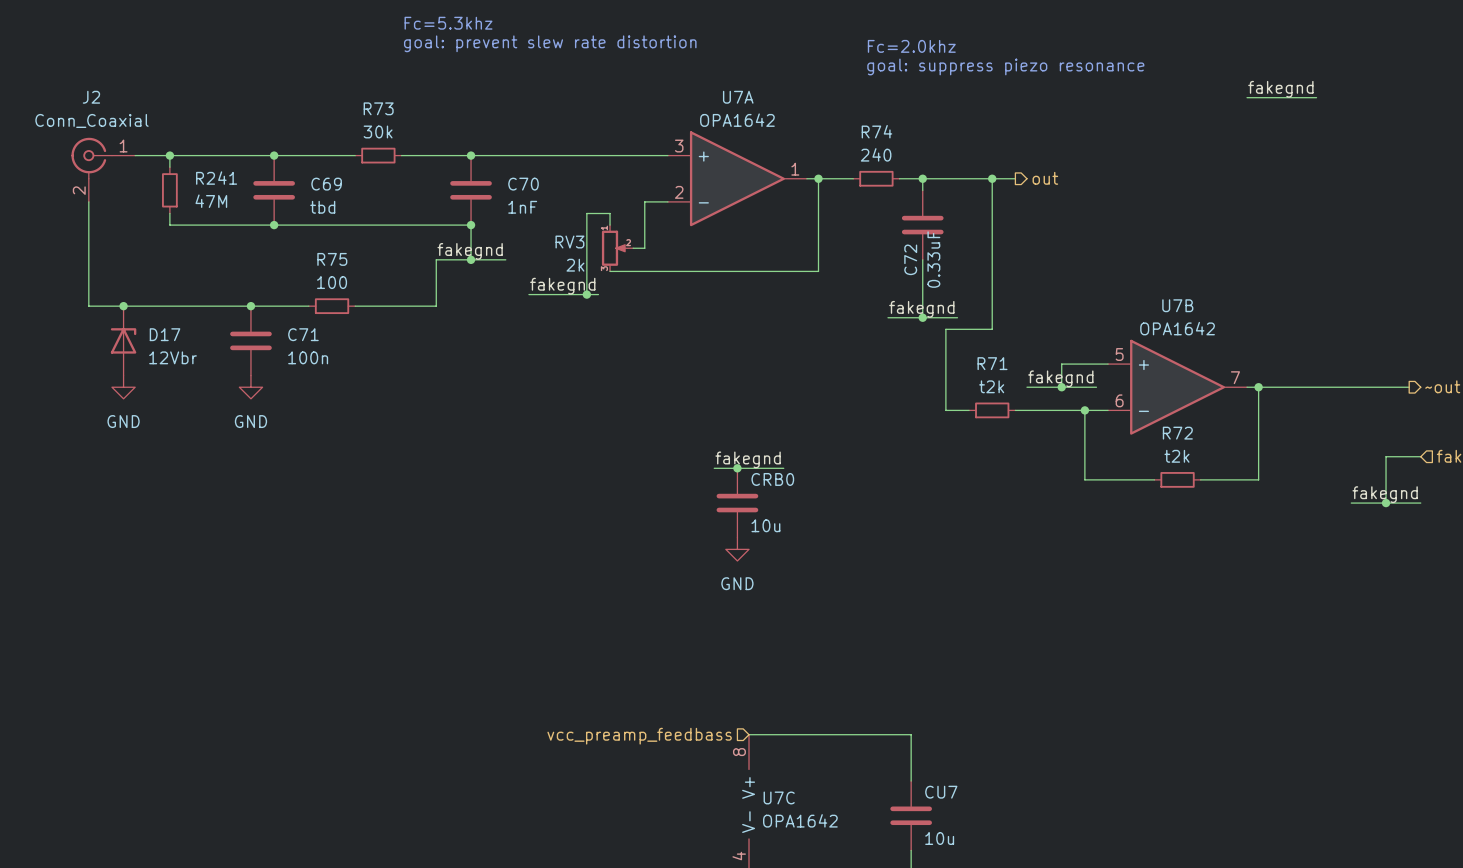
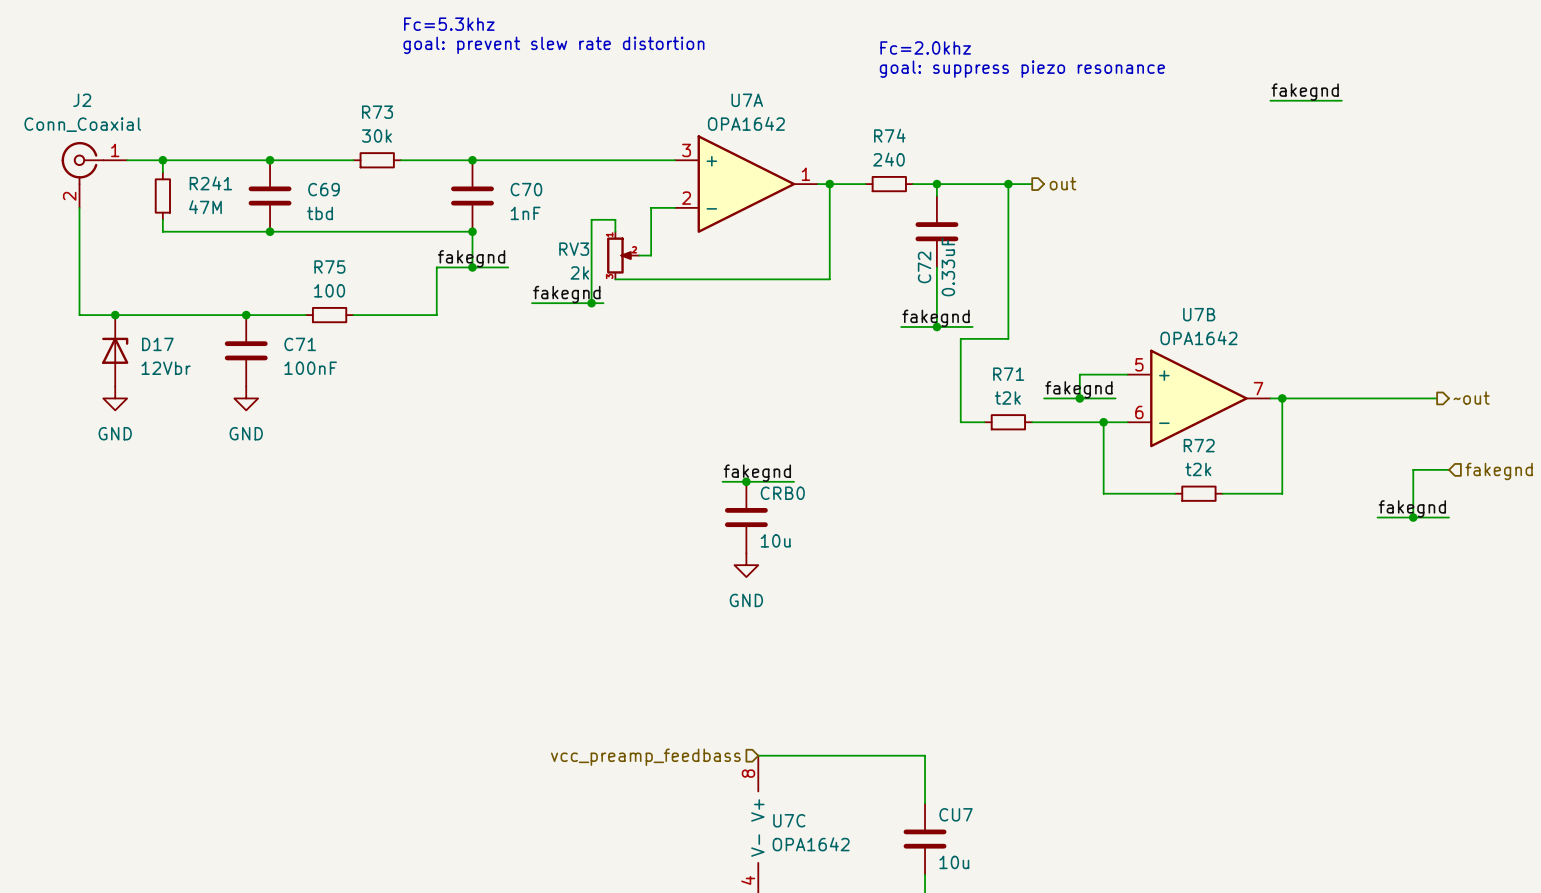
C71 value: 100n (308, 357) -> 100nF (310, 368)

